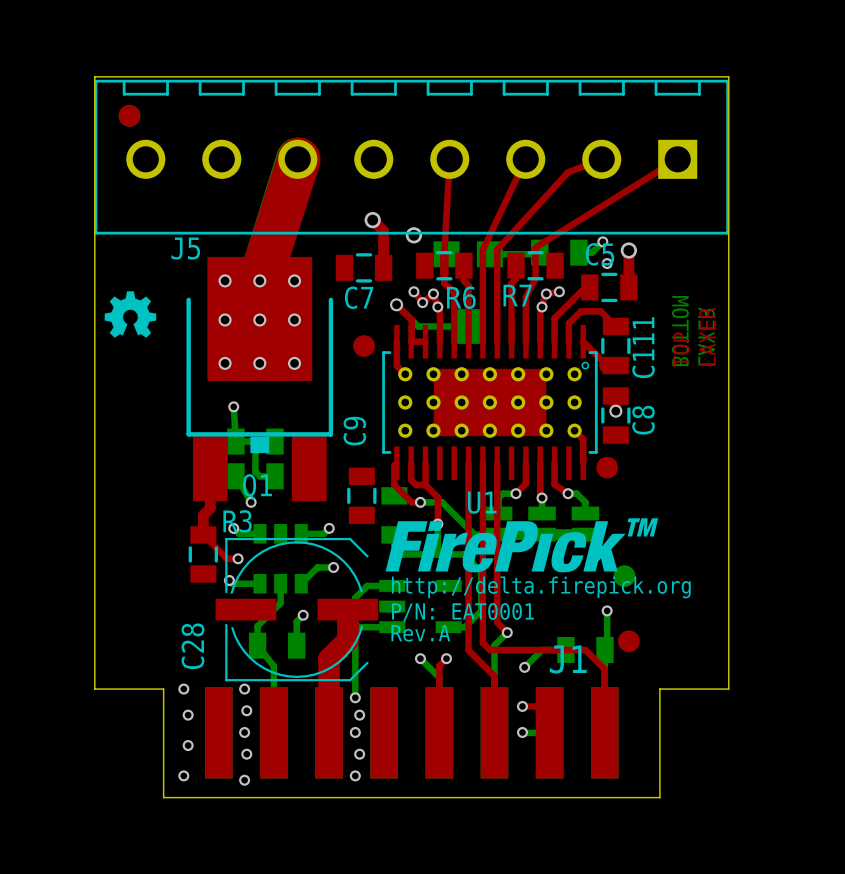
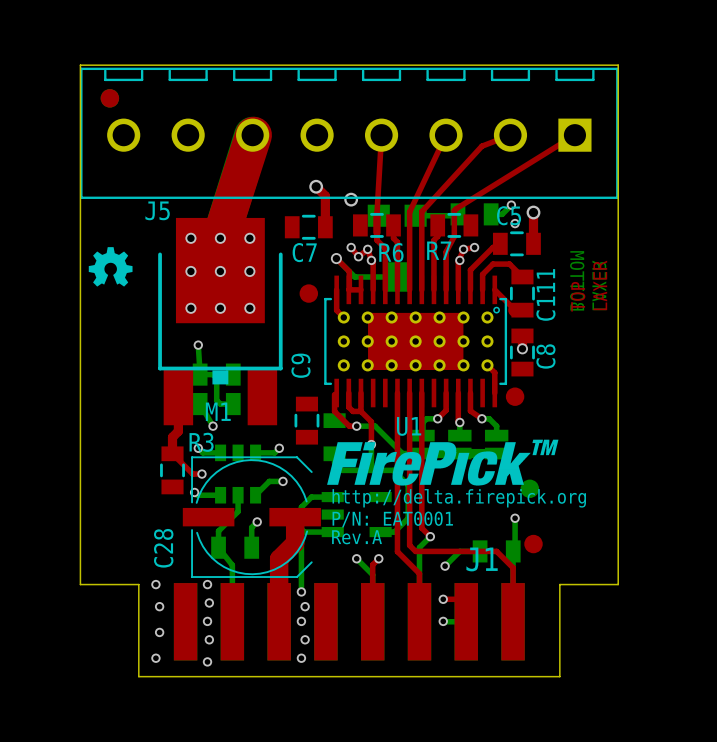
Q1 name: Q1 (257, 487) -> M1 (218, 411)

